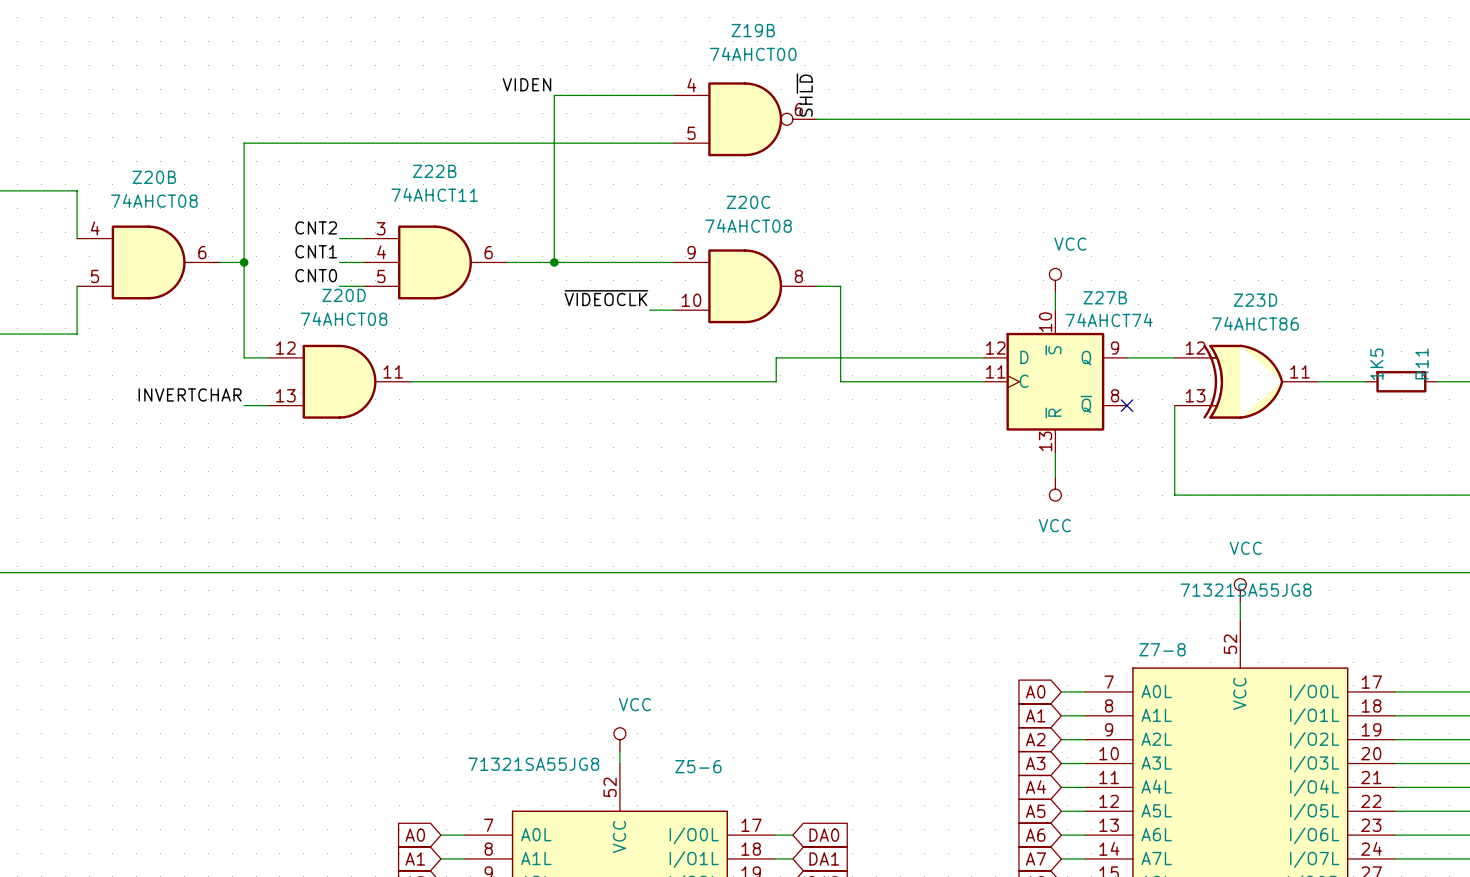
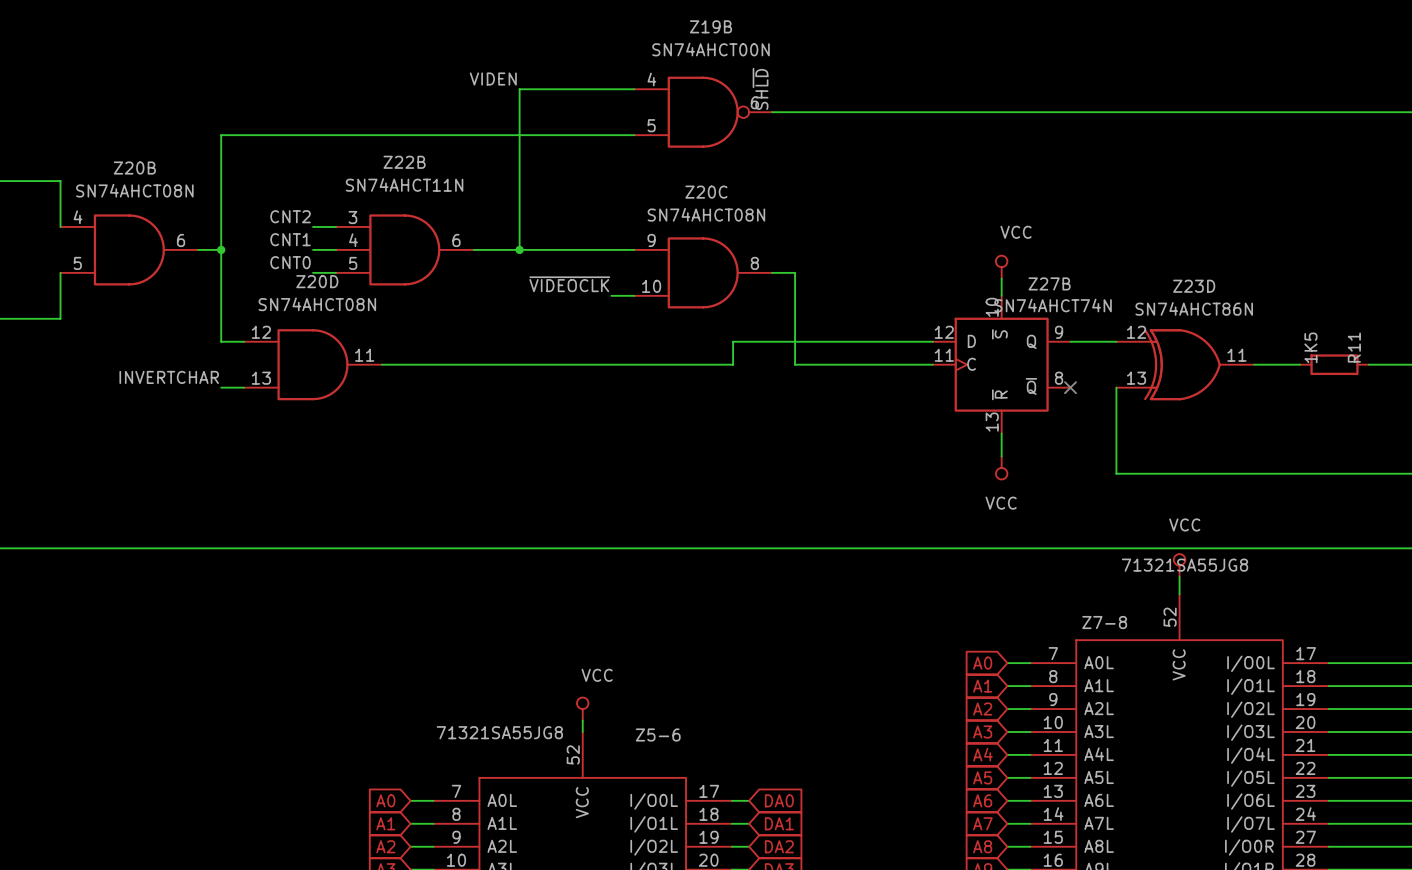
Z19B value: 74AHCT00 (753, 54) -> SN74AHCT00N (711, 49)
Z22B value: 74AHCT11 (434, 194) -> SN74AHCT11N (404, 184)
Z20B value: 74AHCT08 (154, 200) -> SN74AHCT08N (134, 190)
Z20C value: 74AHCT08 (748, 225) -> SN74AHCT08N (706, 214)
Z20D value: 74AHCT08 (344, 318) -> SN74AHCT08N (317, 304)
Z27B value: 74AHCT74 (1109, 320) -> SN74AHCT74N (1053, 305)
Z23D value: 74AHCT86 (1255, 323) -> SN74AHCT86N (1194, 308)

